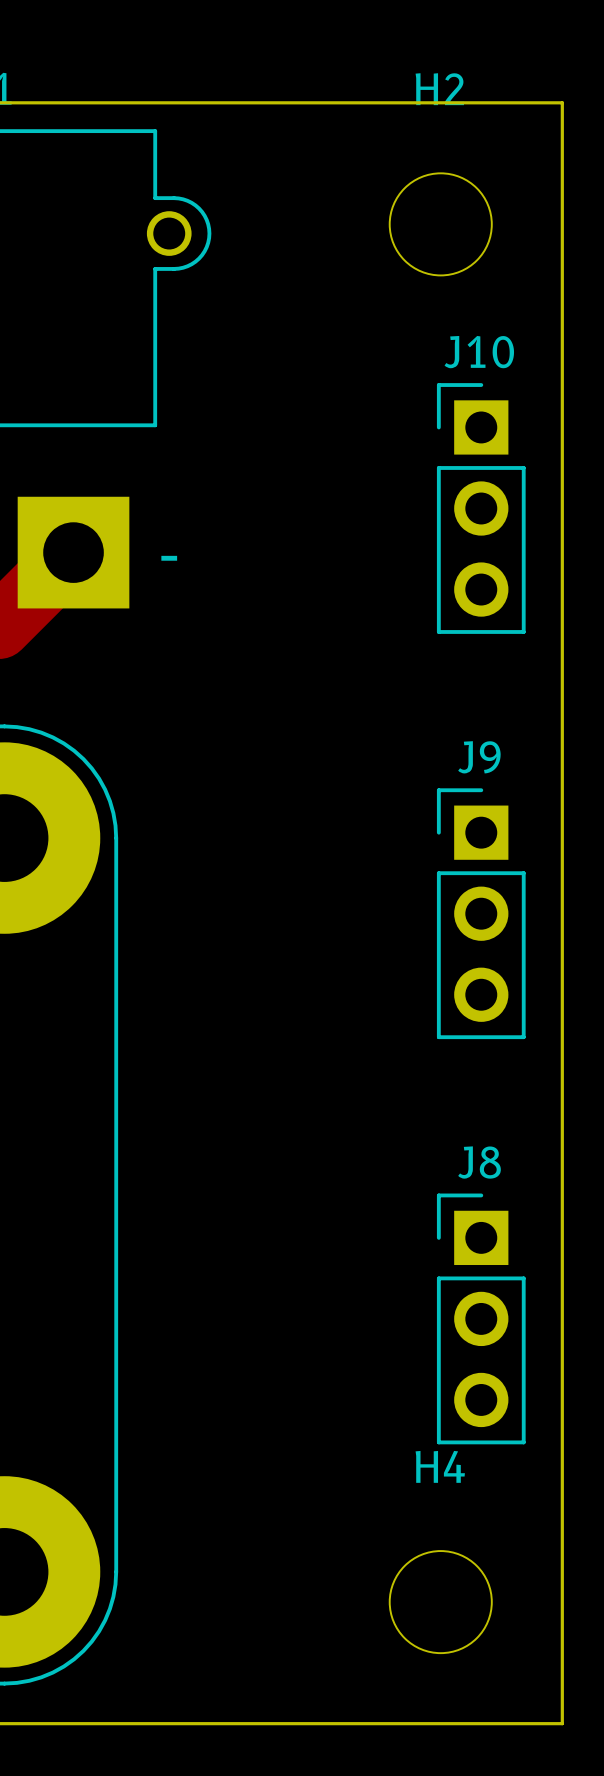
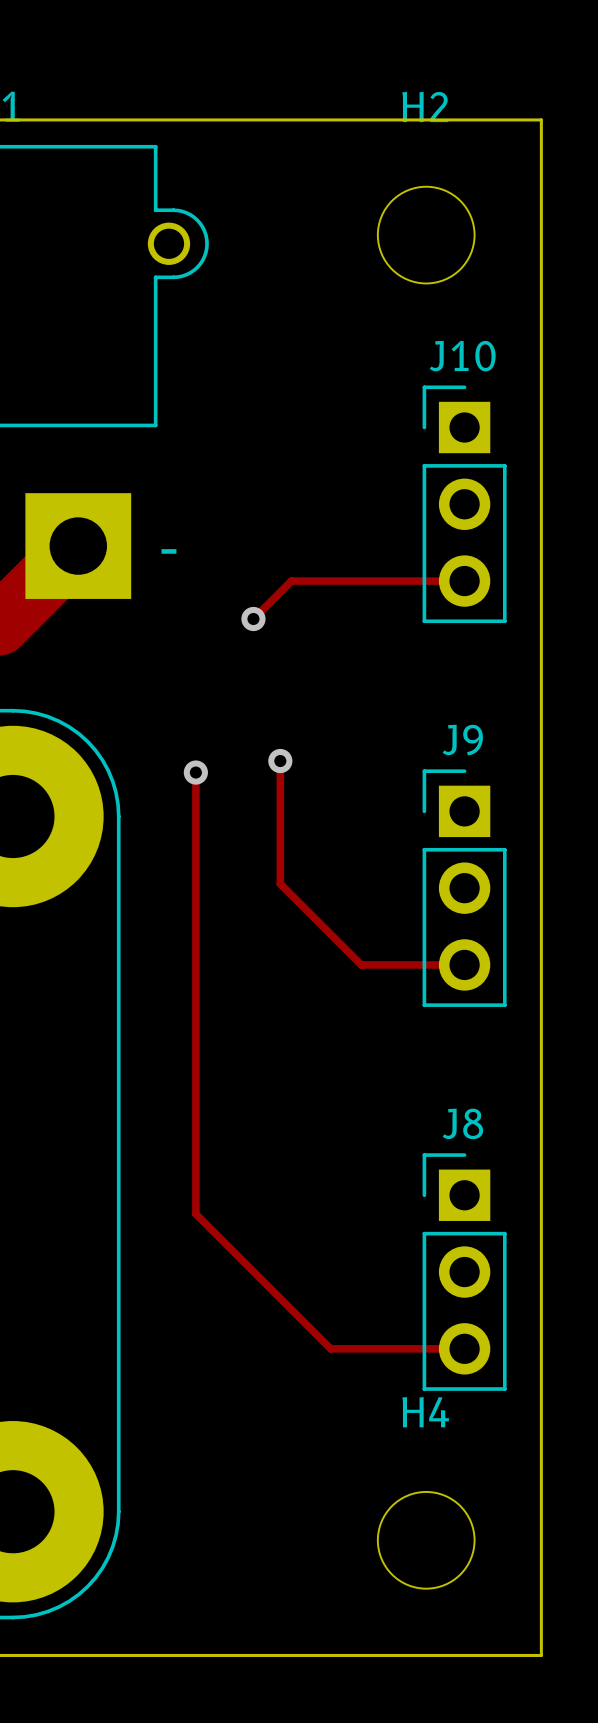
track: none -> (464, 581) (291, 581) (253, 618)
via: none -> (253, 618)
track: none -> (280, 761) (280, 883) (361, 964) (464, 964)
via: none -> (280, 761)
track: none -> (195, 772) (195, 1214) (330, 1348) (464, 1348)
via: none -> (195, 772)

